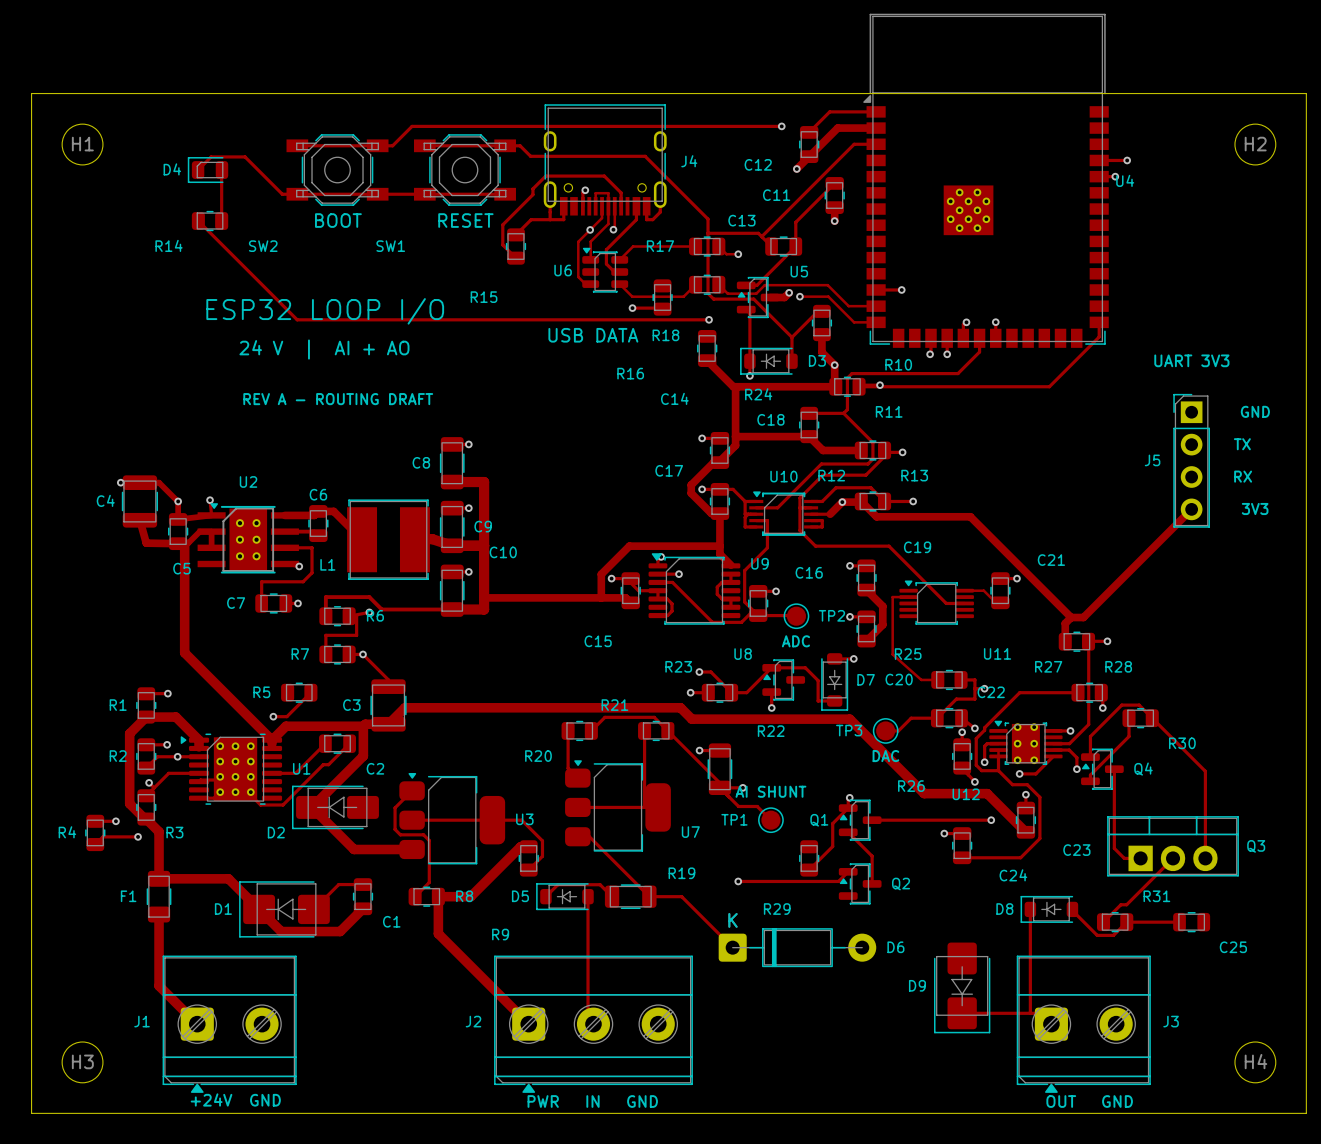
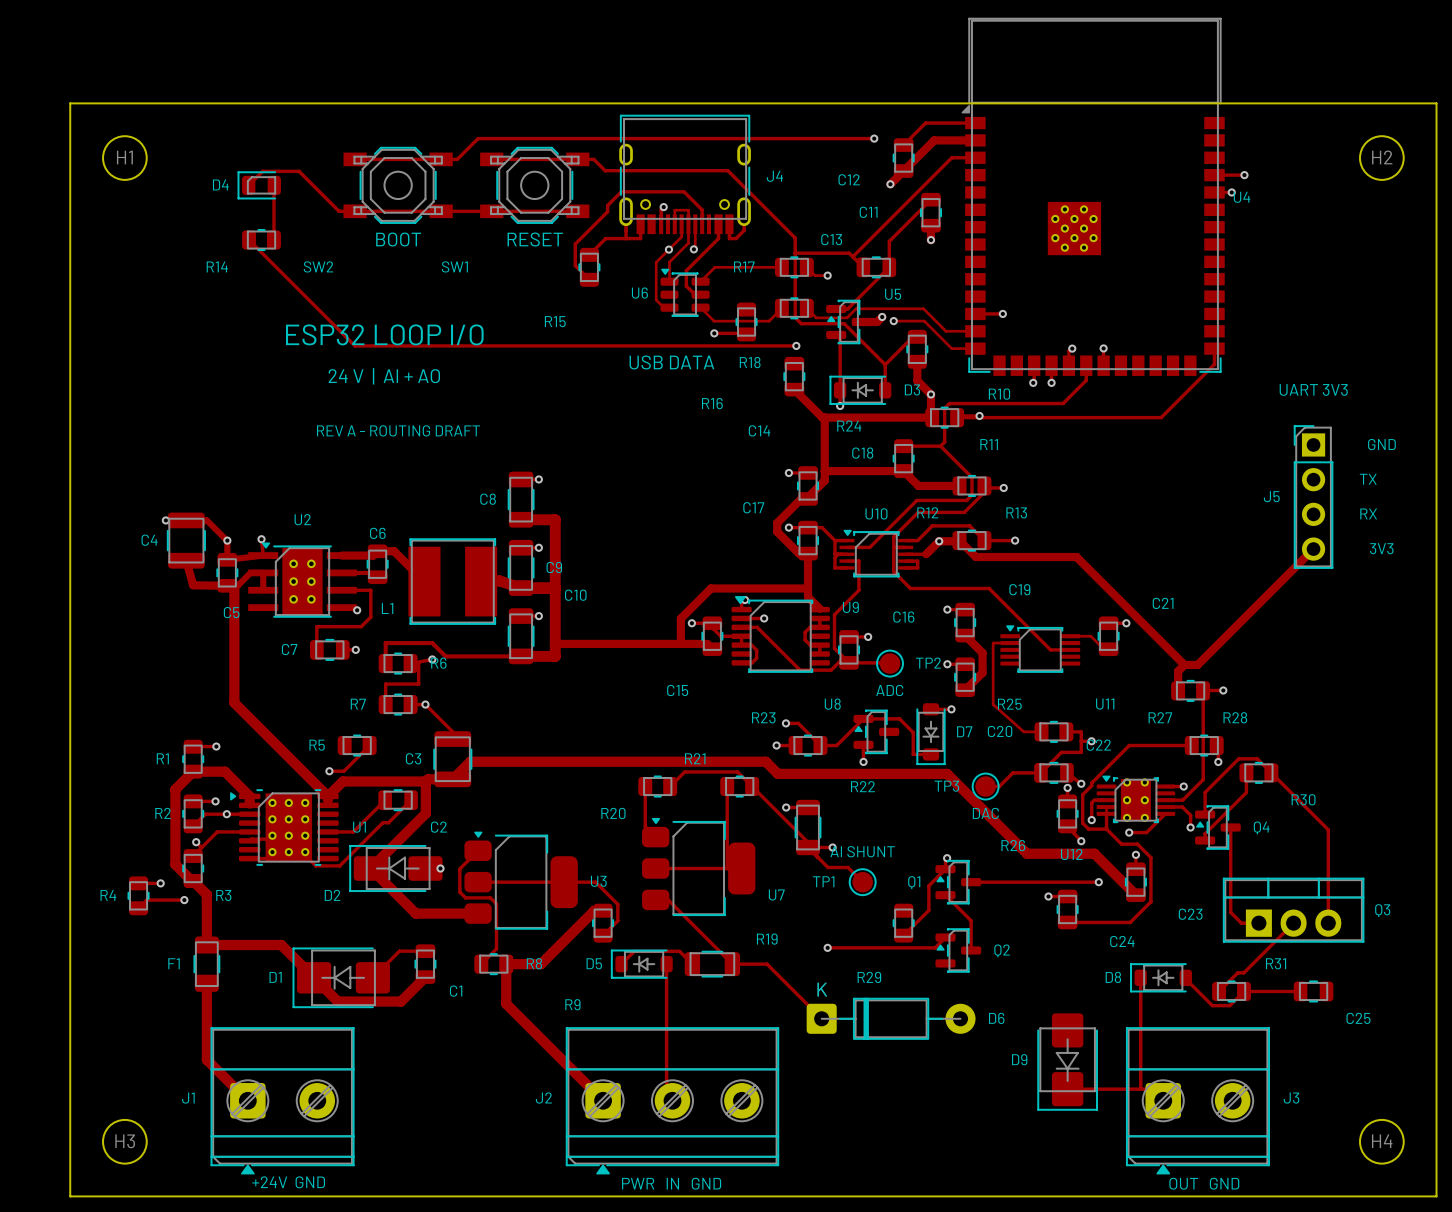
via: none -> (440, 868)

